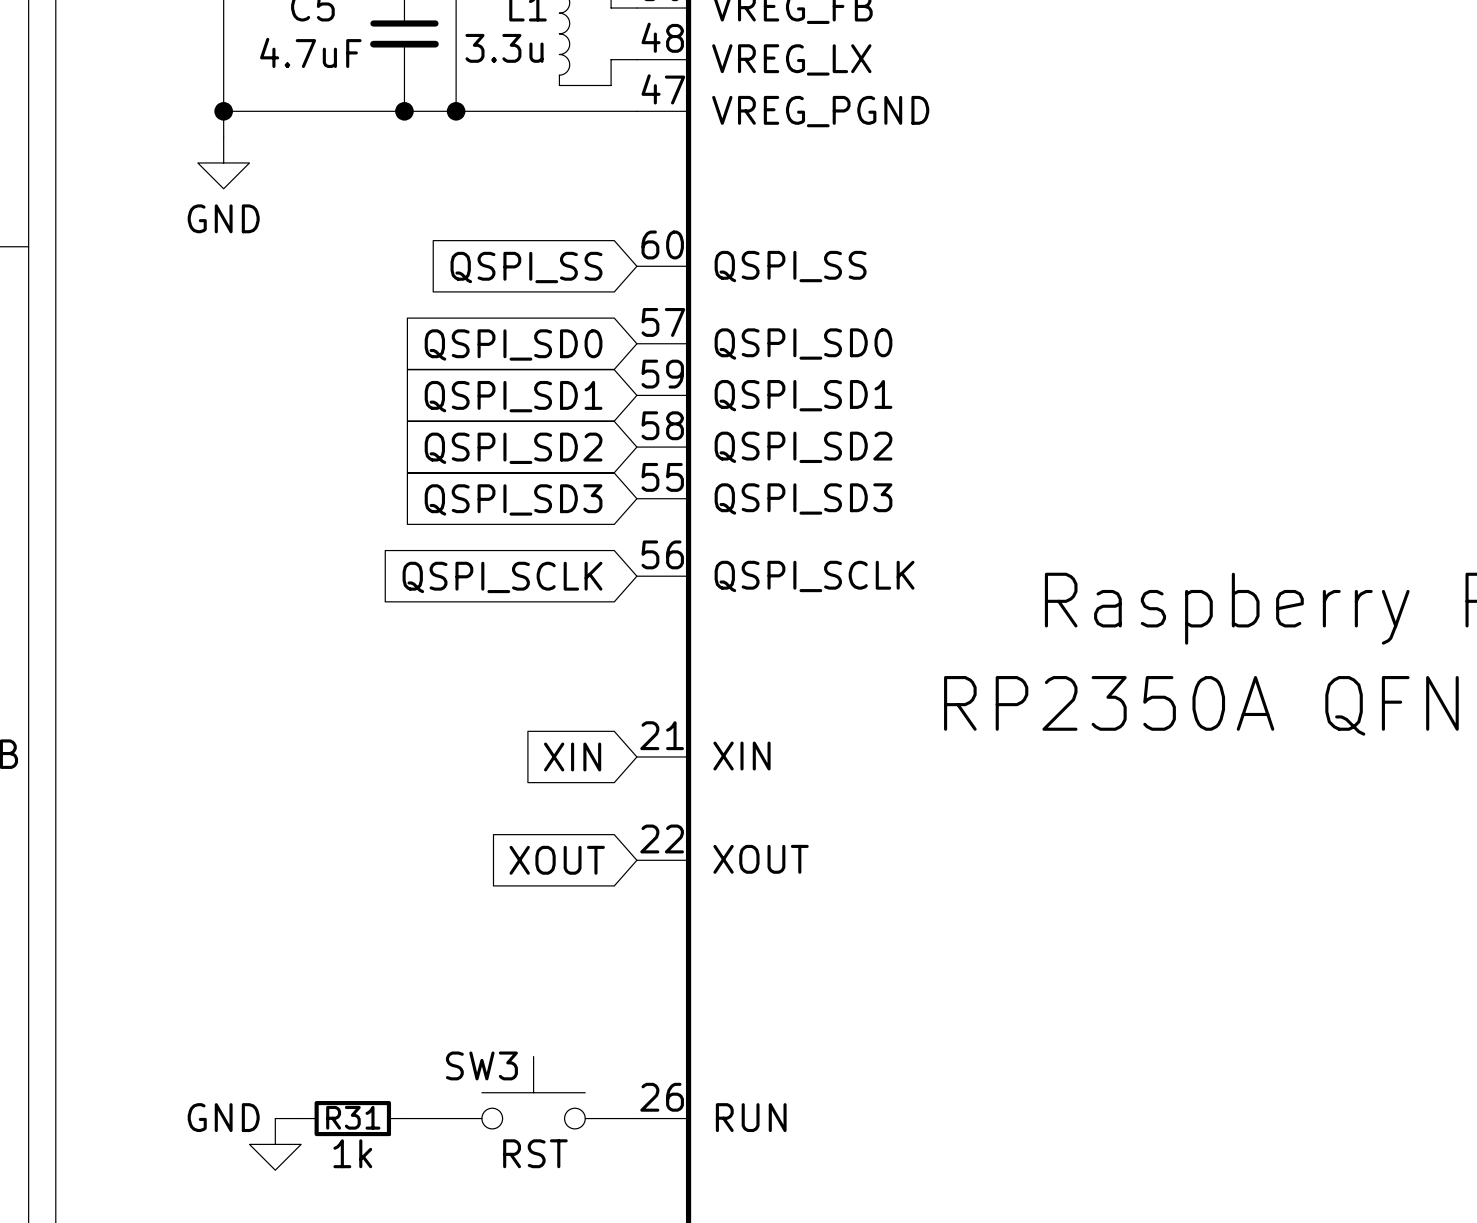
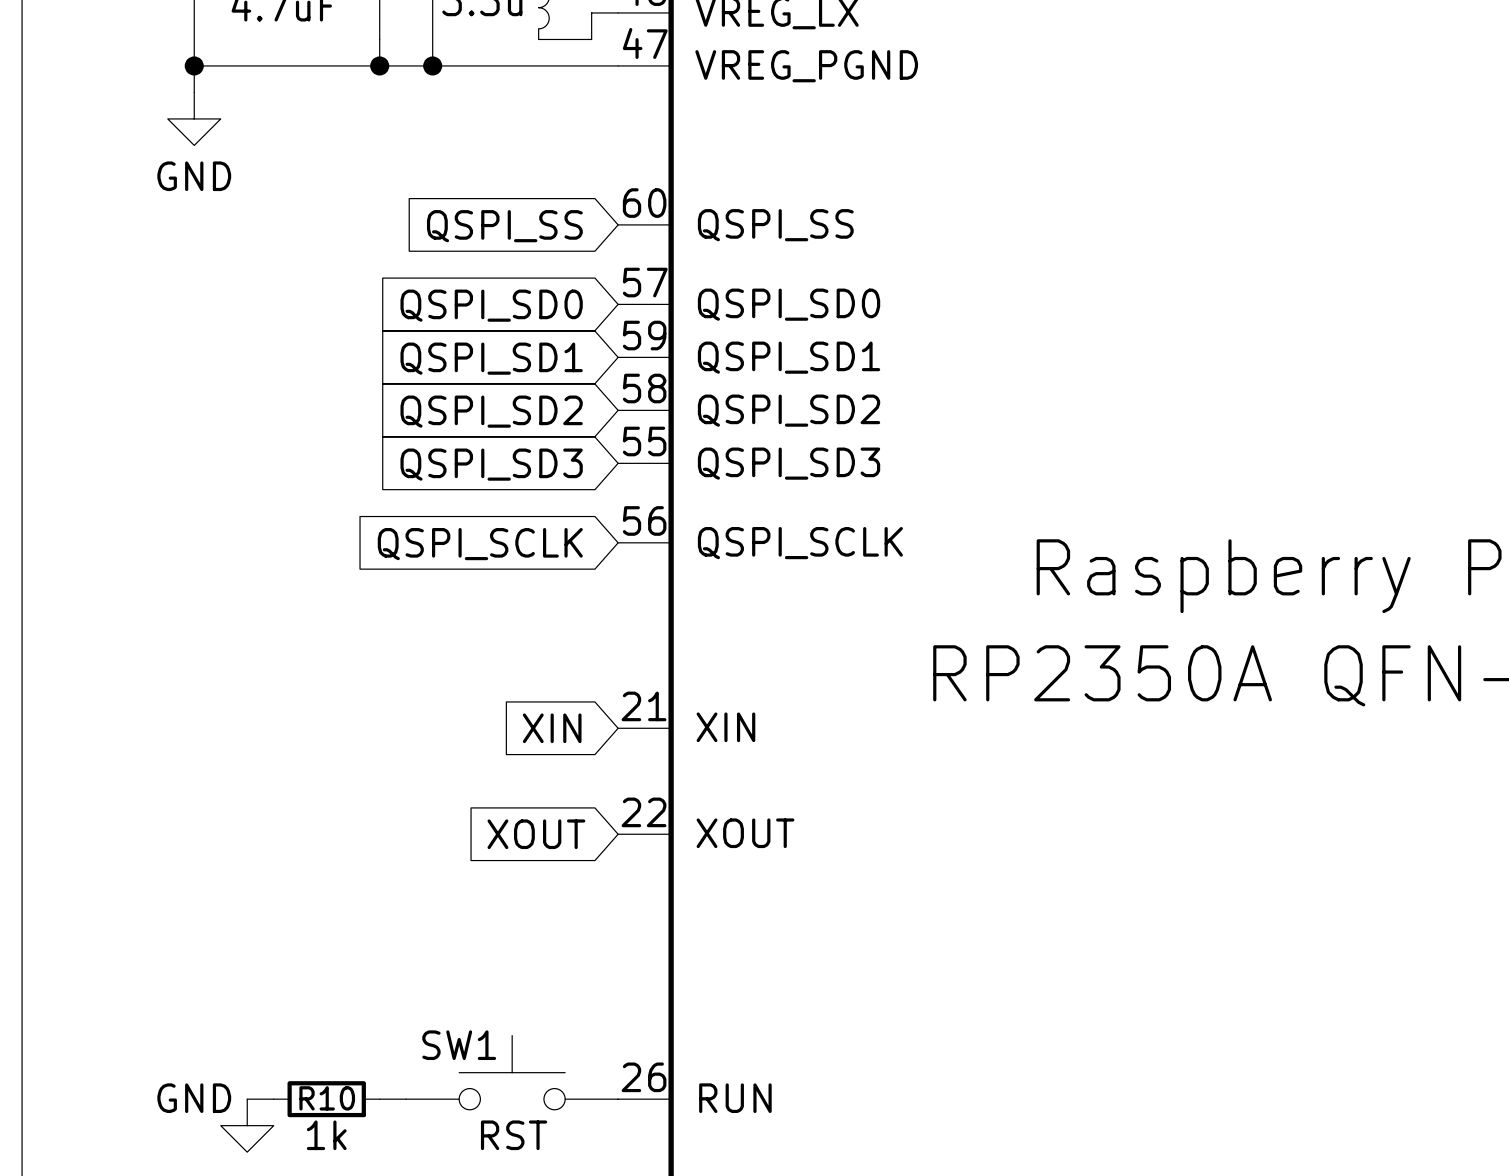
SW3 name: SW3 (481, 1065) -> SW1 (459, 1045)
R31 name: R31 (353, 1117) -> R10 (327, 1098)

